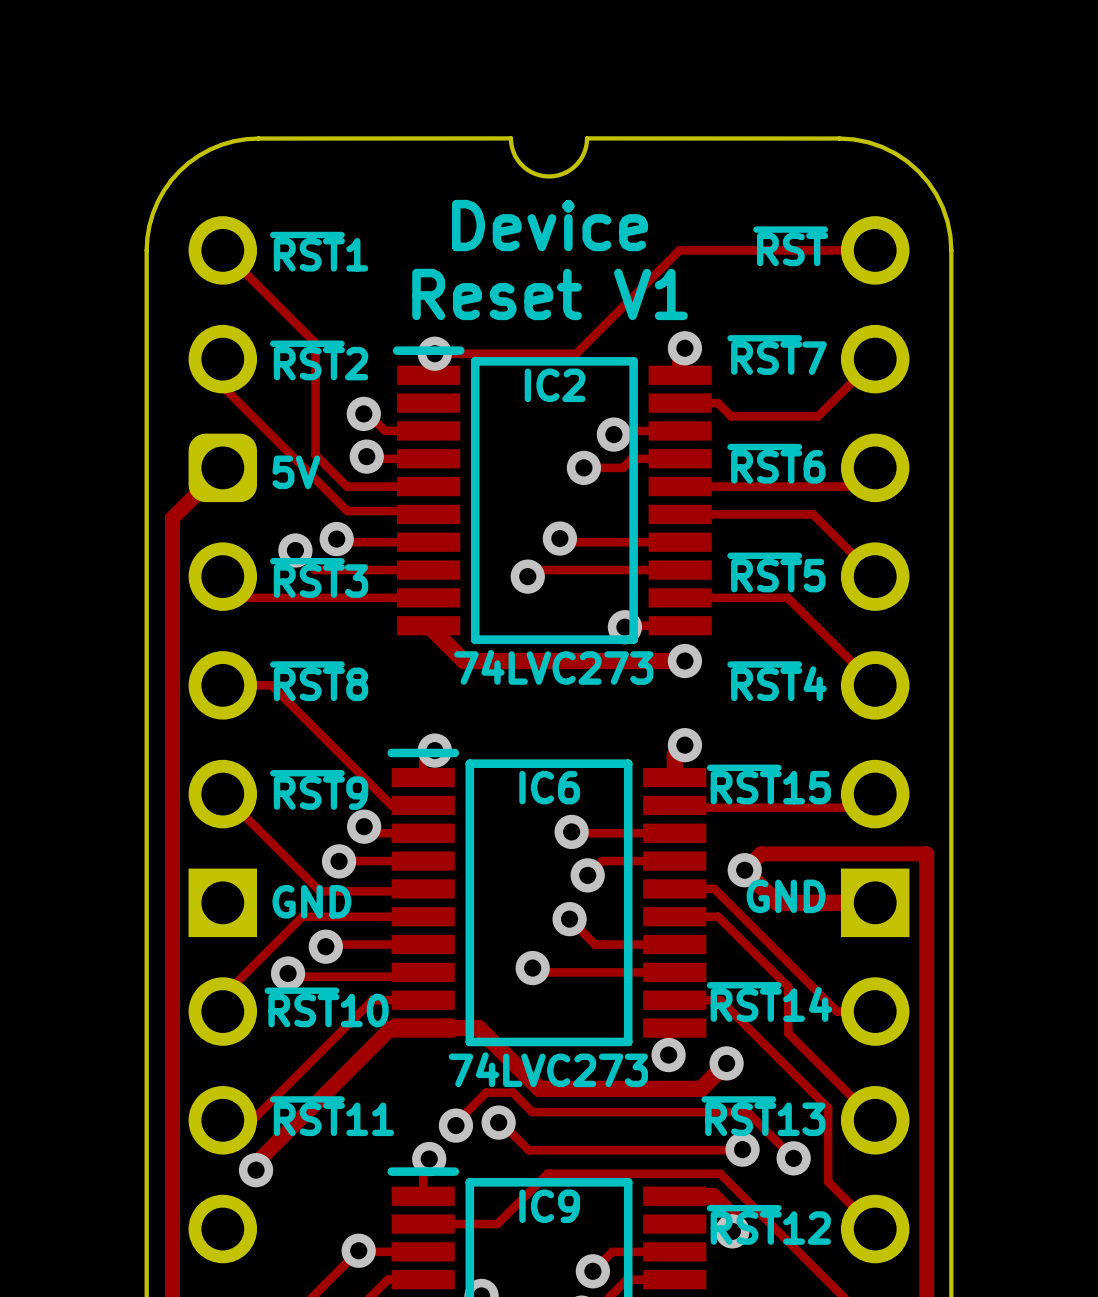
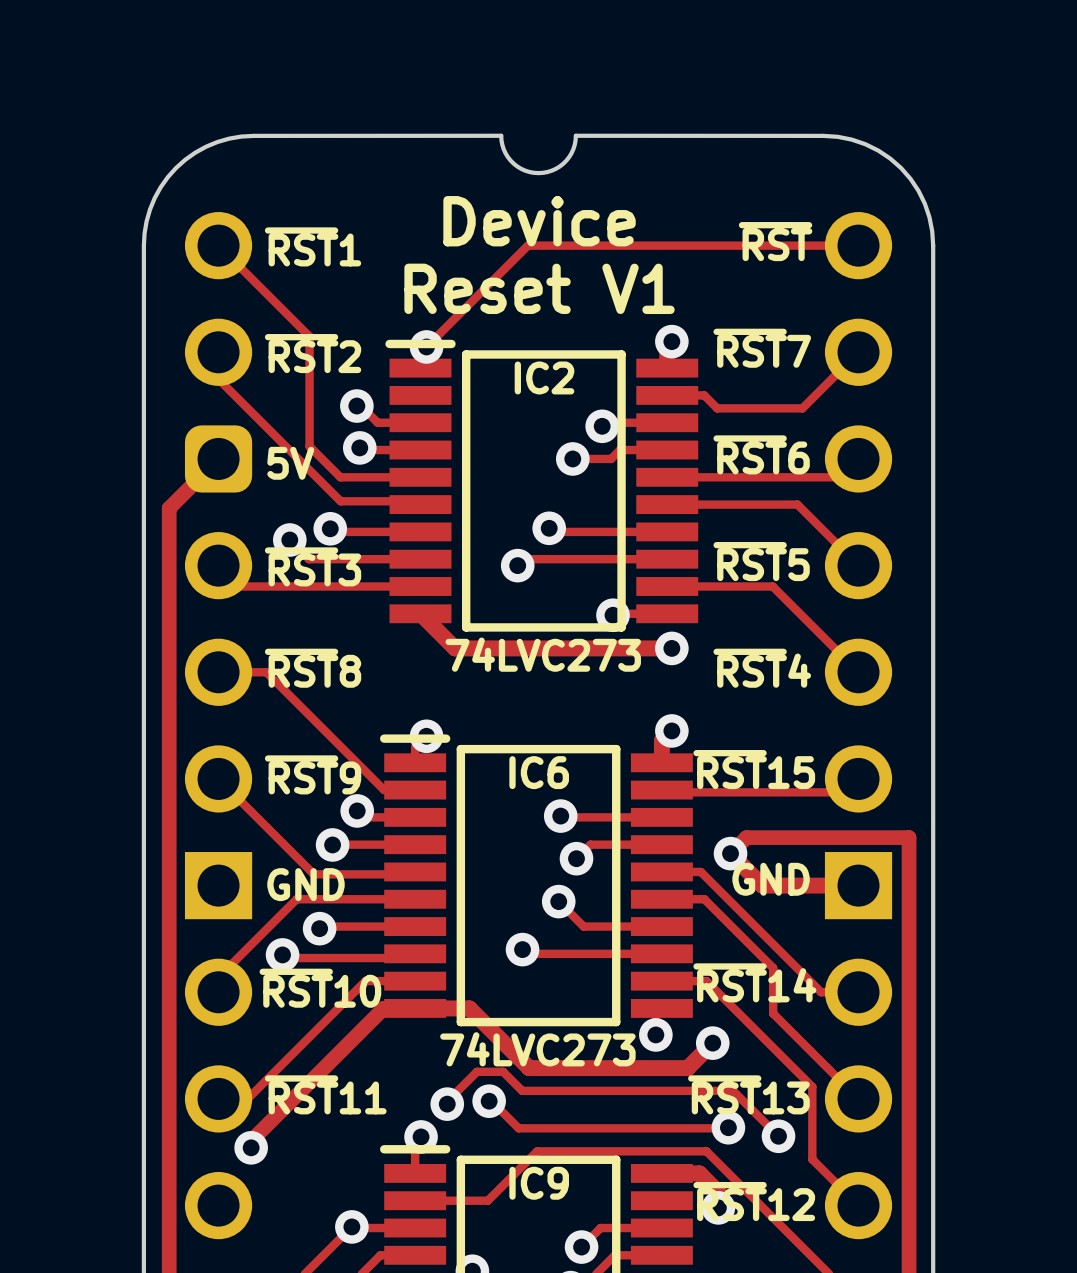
track: (679, 250) (576, 353) (434, 353) -> (666, 245) (527, 245) (426, 346)

